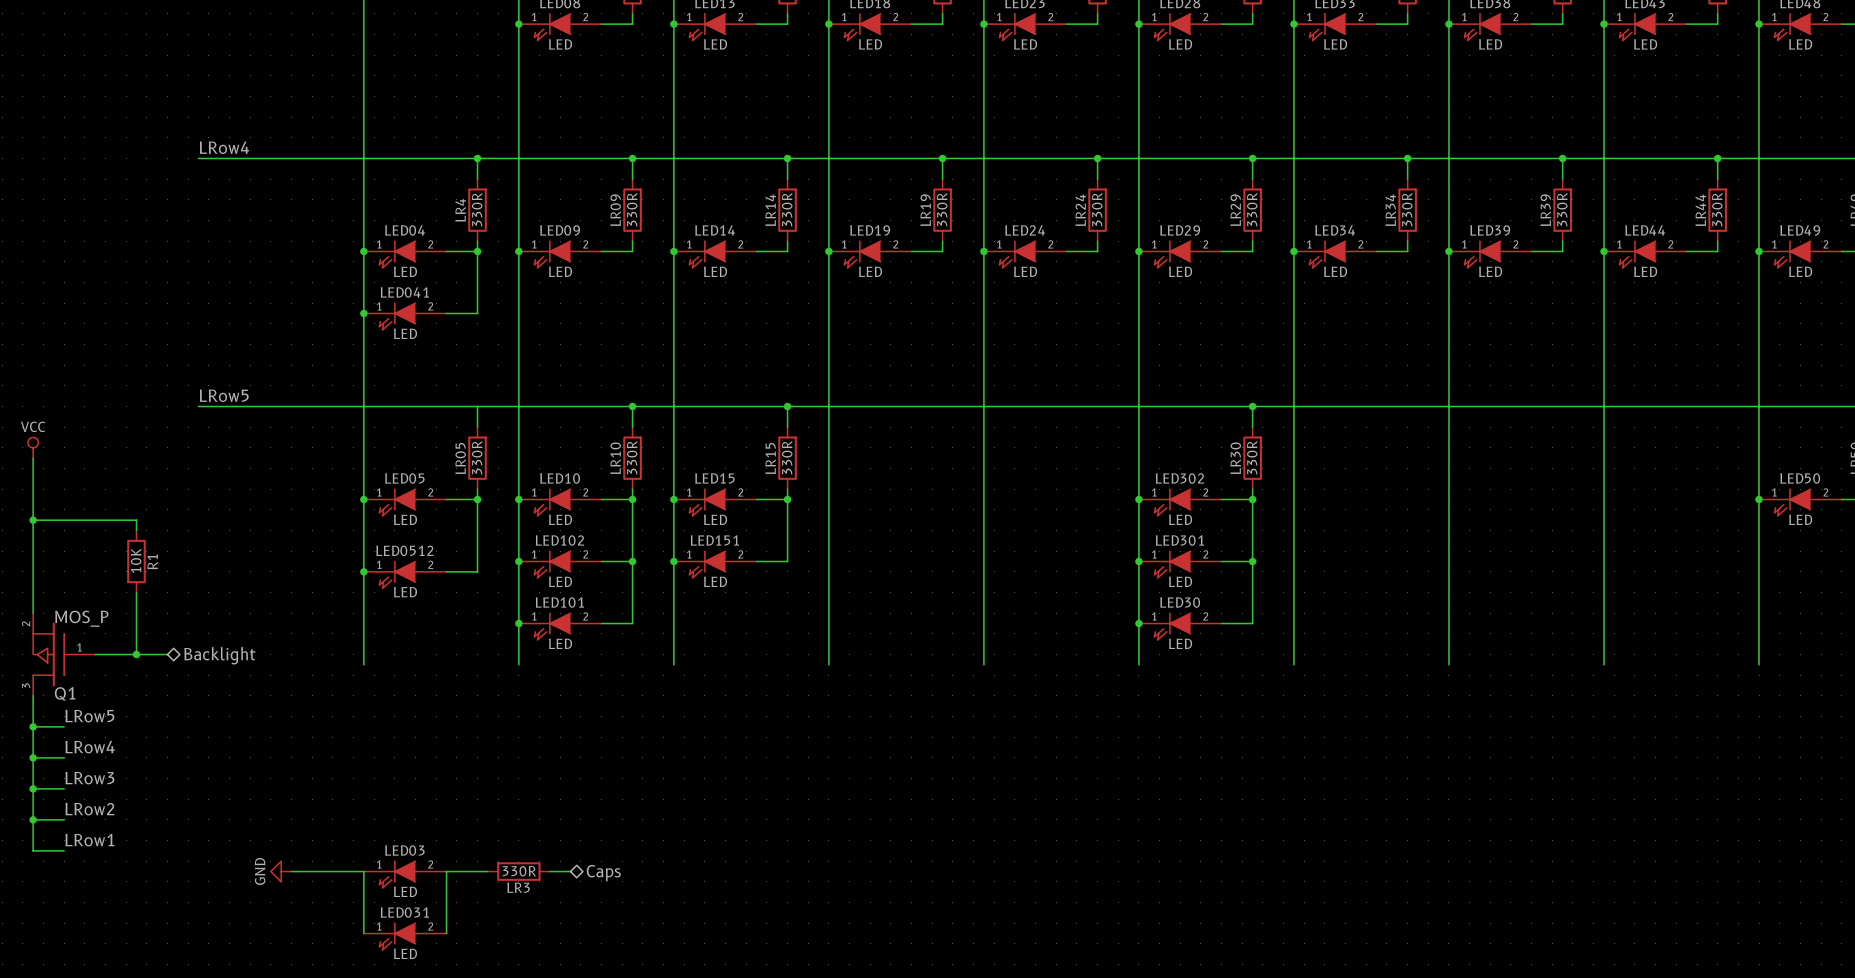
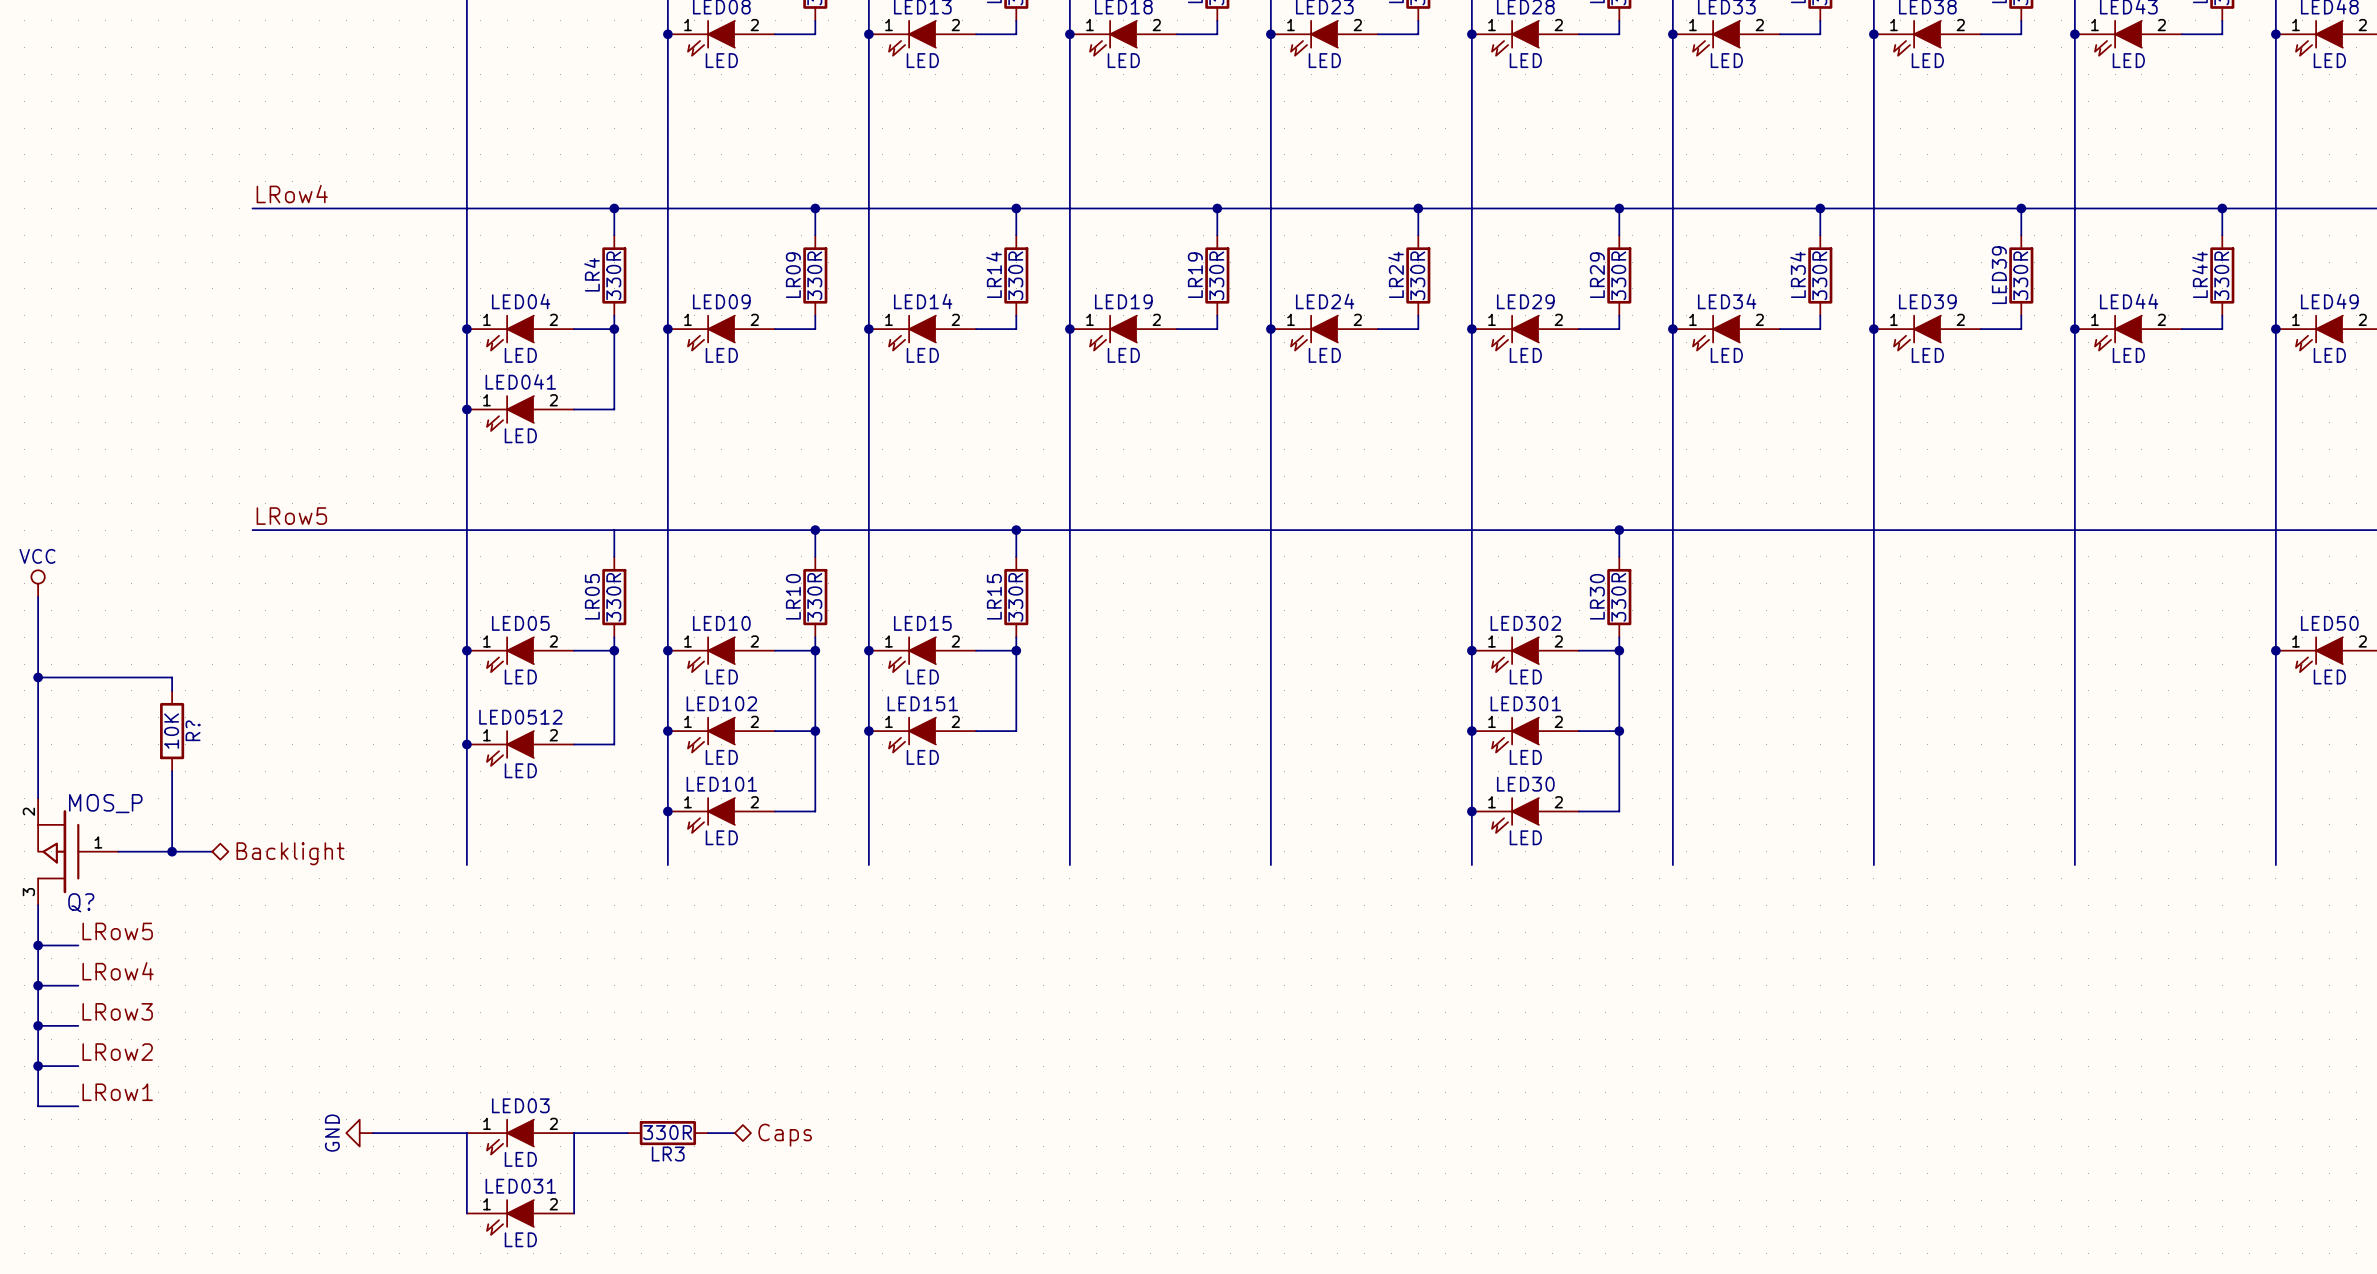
LR39 name: LR39 (1545, 210) -> LED39 (1999, 275)
R1 name: R1 (152, 561) -> R? (193, 730)
Q1 name: Q1 (65, 693) -> Q? (81, 902)

